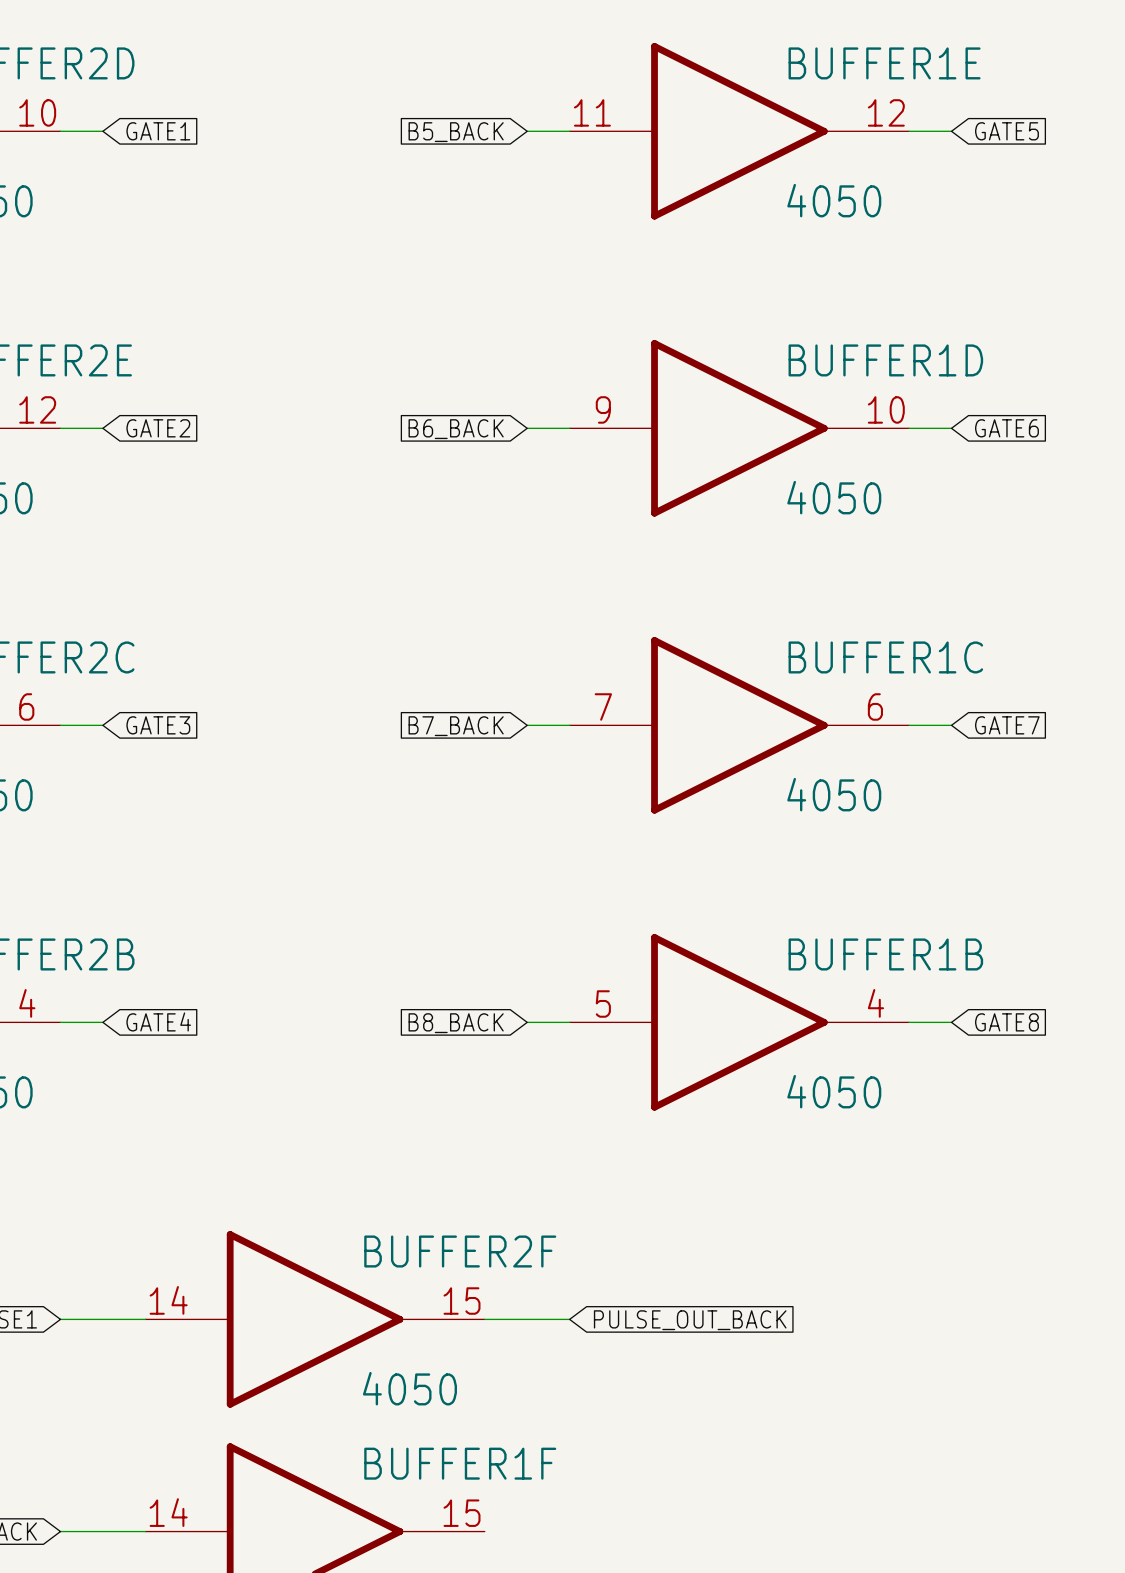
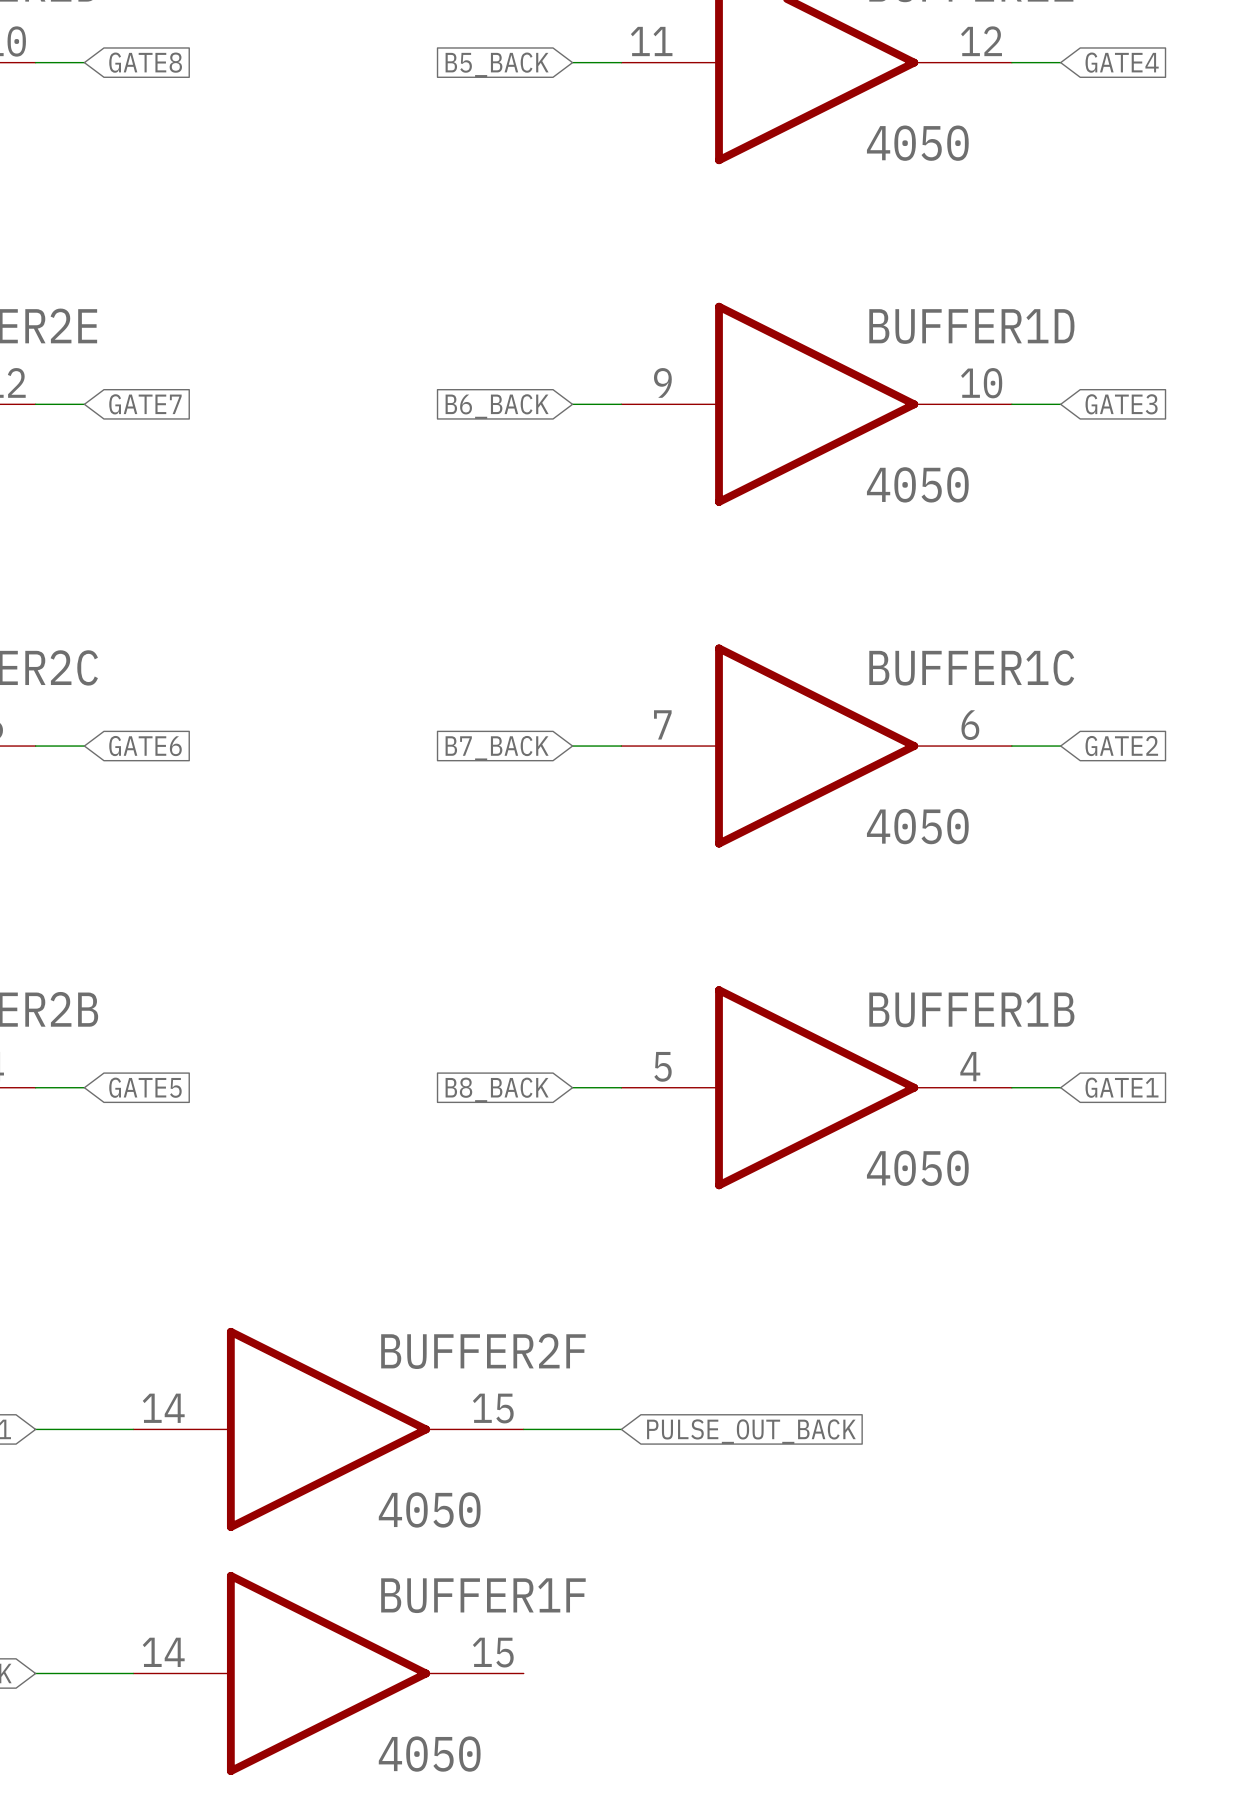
global label: GATE1 (158, 131) -> GATE8 (145, 62)
global label: GATE5 (1006, 131) -> GATE4 (1122, 62)
global label: GATE2 (158, 428) -> GATE7 (145, 404)
global label: GATE6 (1006, 428) -> GATE3 (1121, 404)
global label: GATE3 (158, 725) -> GATE6 (145, 746)
global label: GATE7 (1007, 725) -> GATE2 (1121, 746)
global label: GATE4 (158, 1021) -> GATE5 (145, 1087)
global label: GATE8 (1006, 1022) -> GATE1 (1122, 1087)

